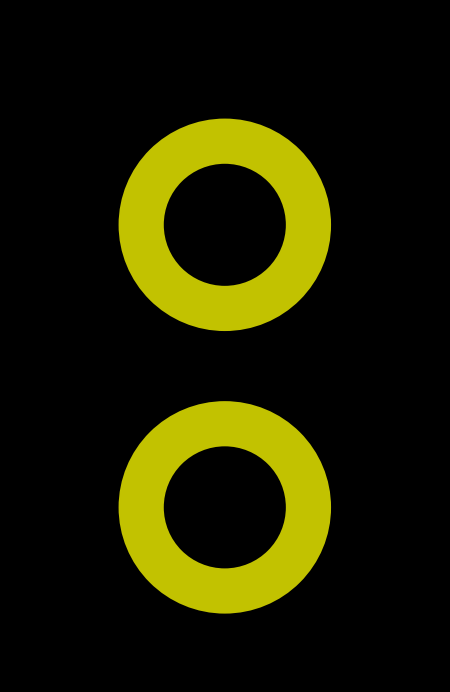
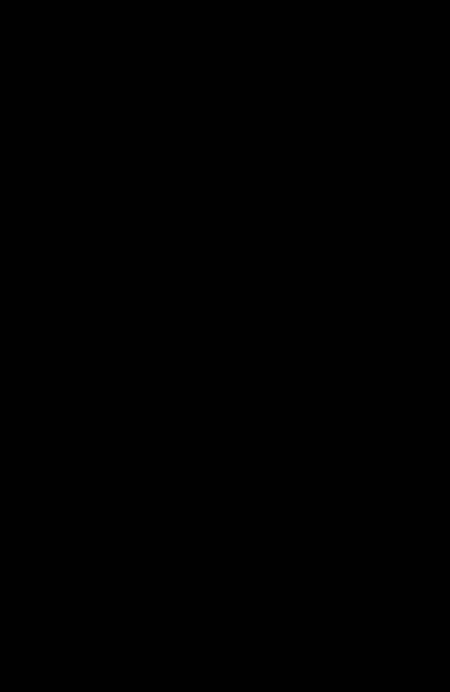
part: (224, 224) -> none
part: (224, 507) -> none

